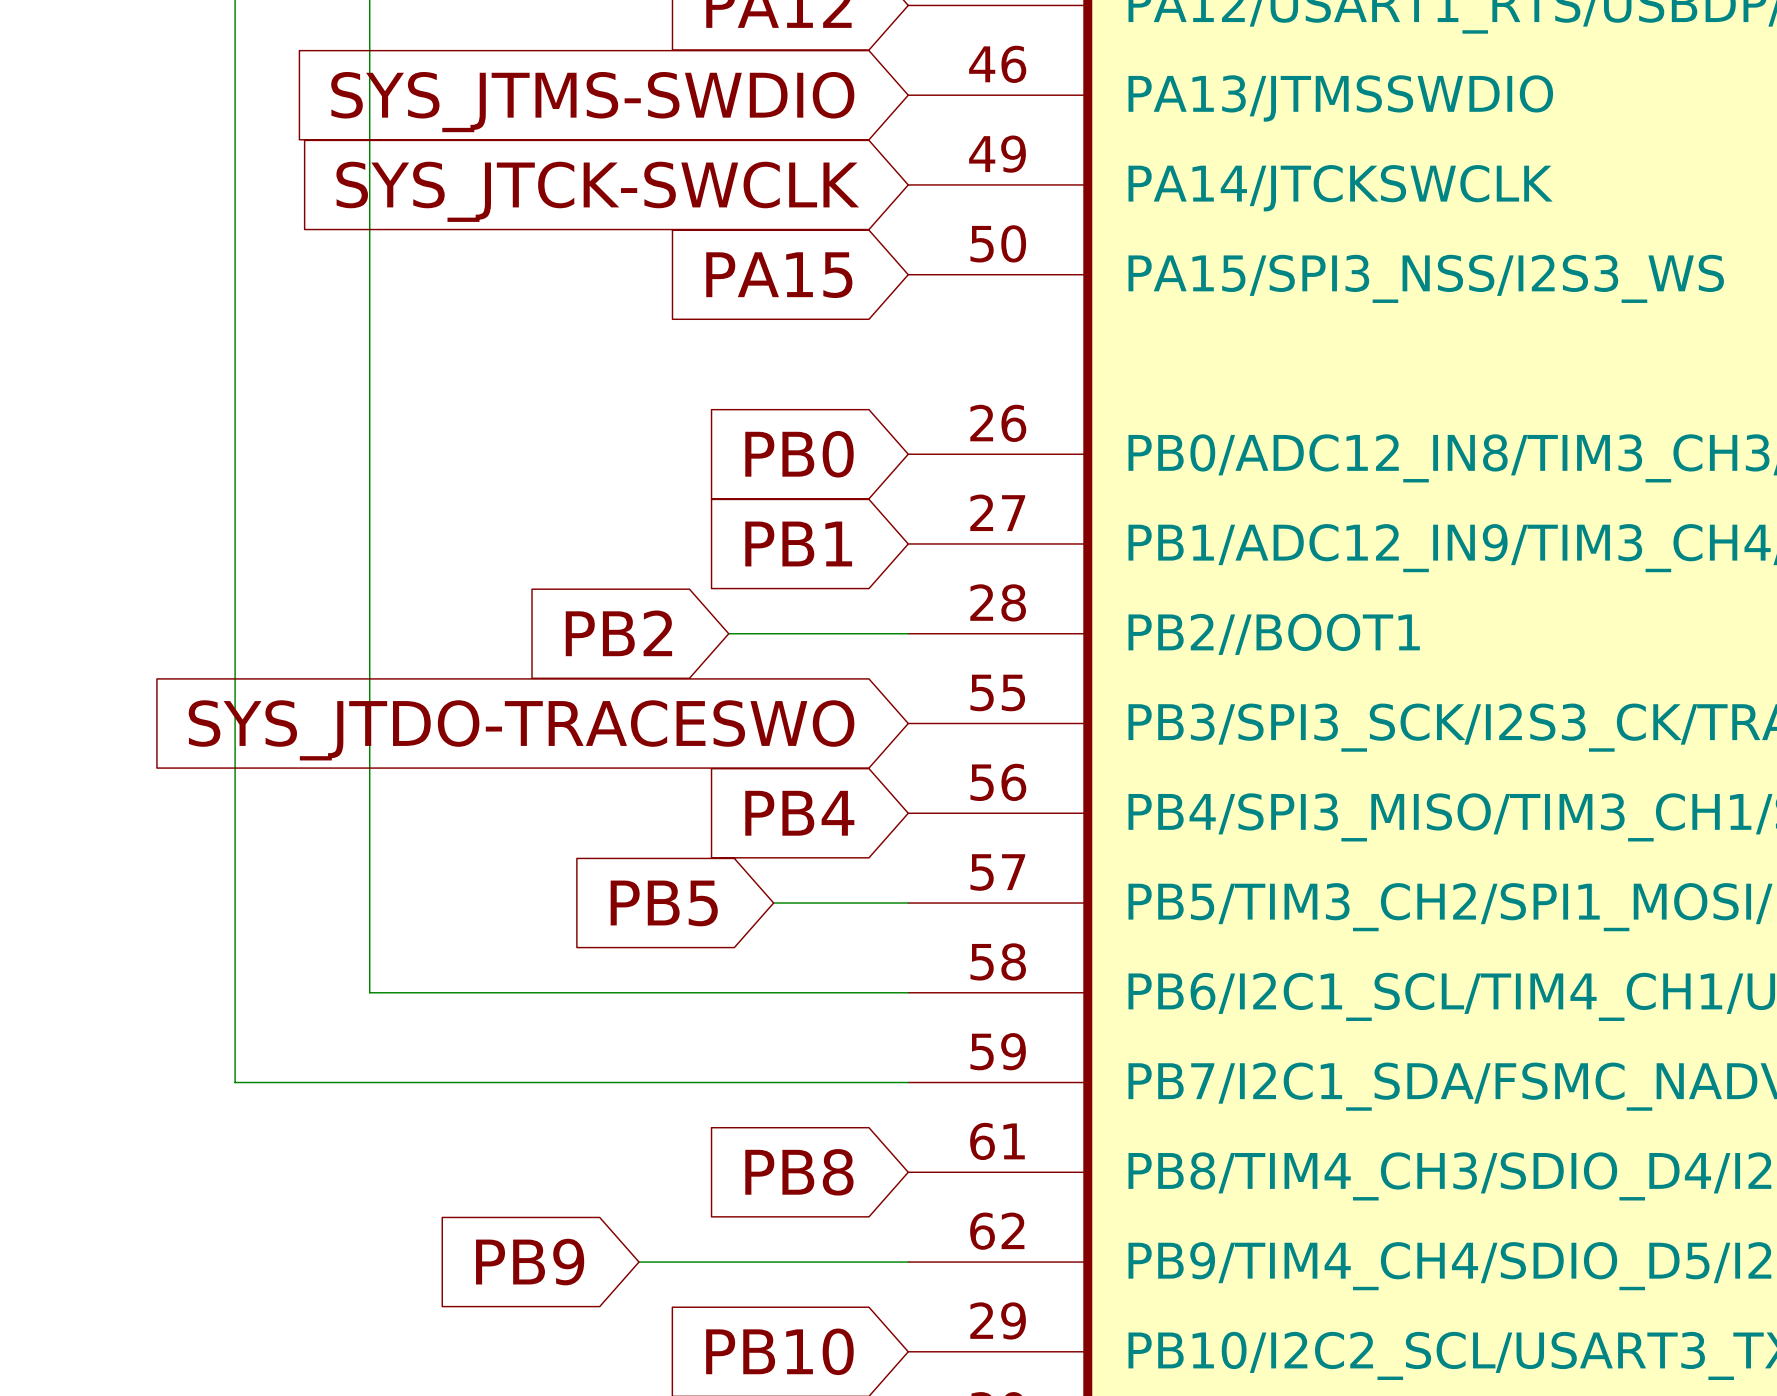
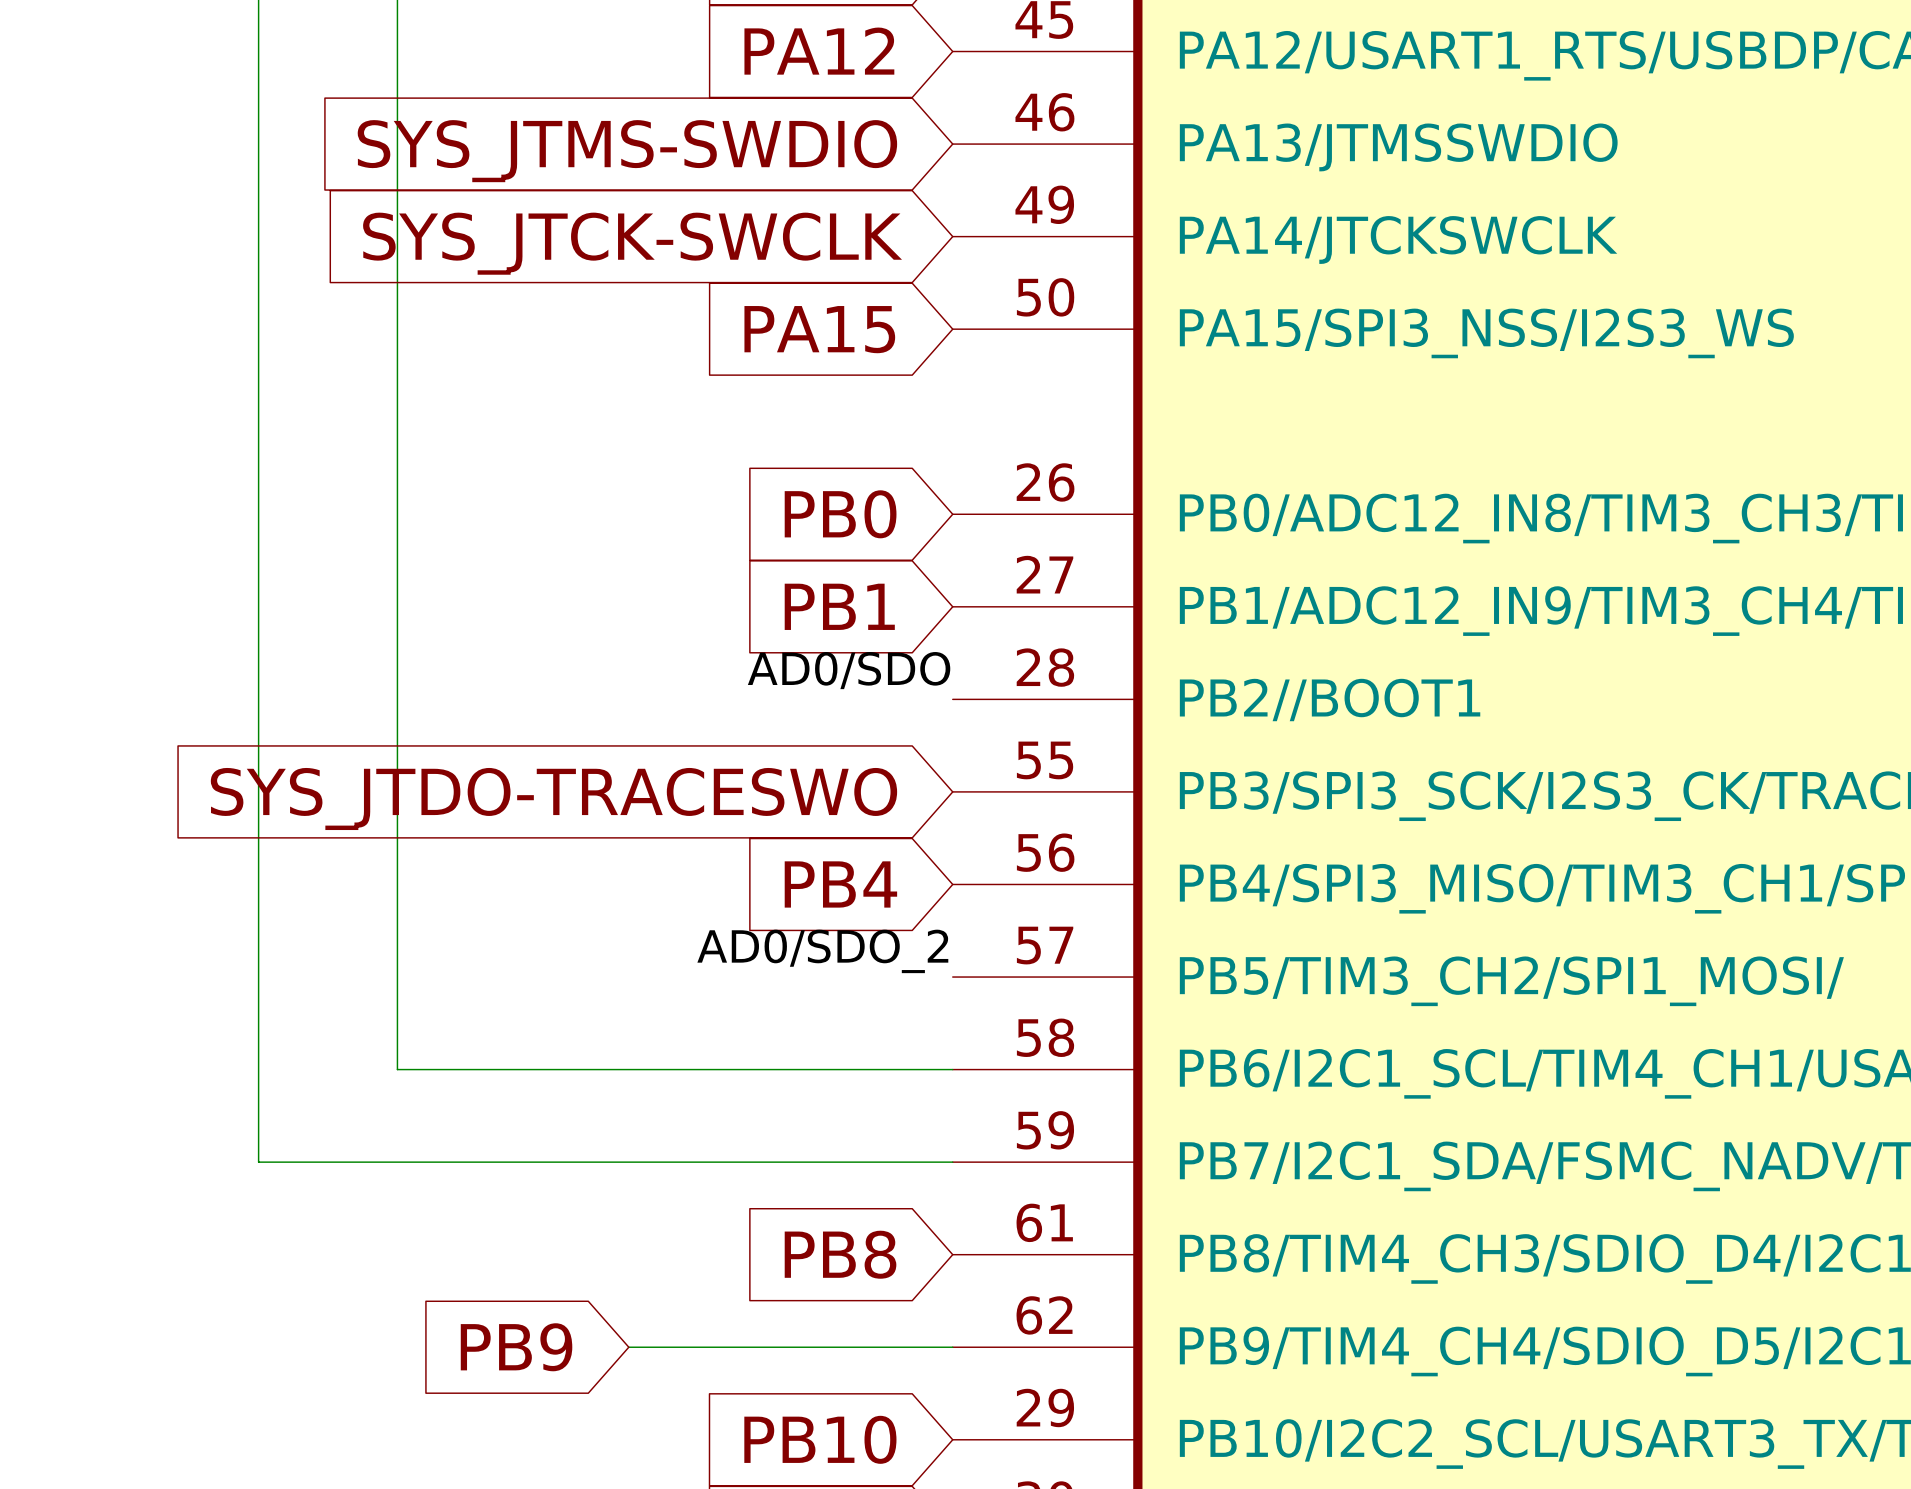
label: none -> AD0/SDO (849, 670)
global label: PB2 (618, 633) -> none
wire: (728, 633) (908, 633) -> none
label: none -> AD0/SDO_2 (822, 951)
global label: PB5 (664, 903) -> none
wire: (773, 903) (908, 903) -> none
global label position: PB9 (530, 1262) -> PB9 (516, 1347)
wire: none -> (628, 1347) (675, 1347)

